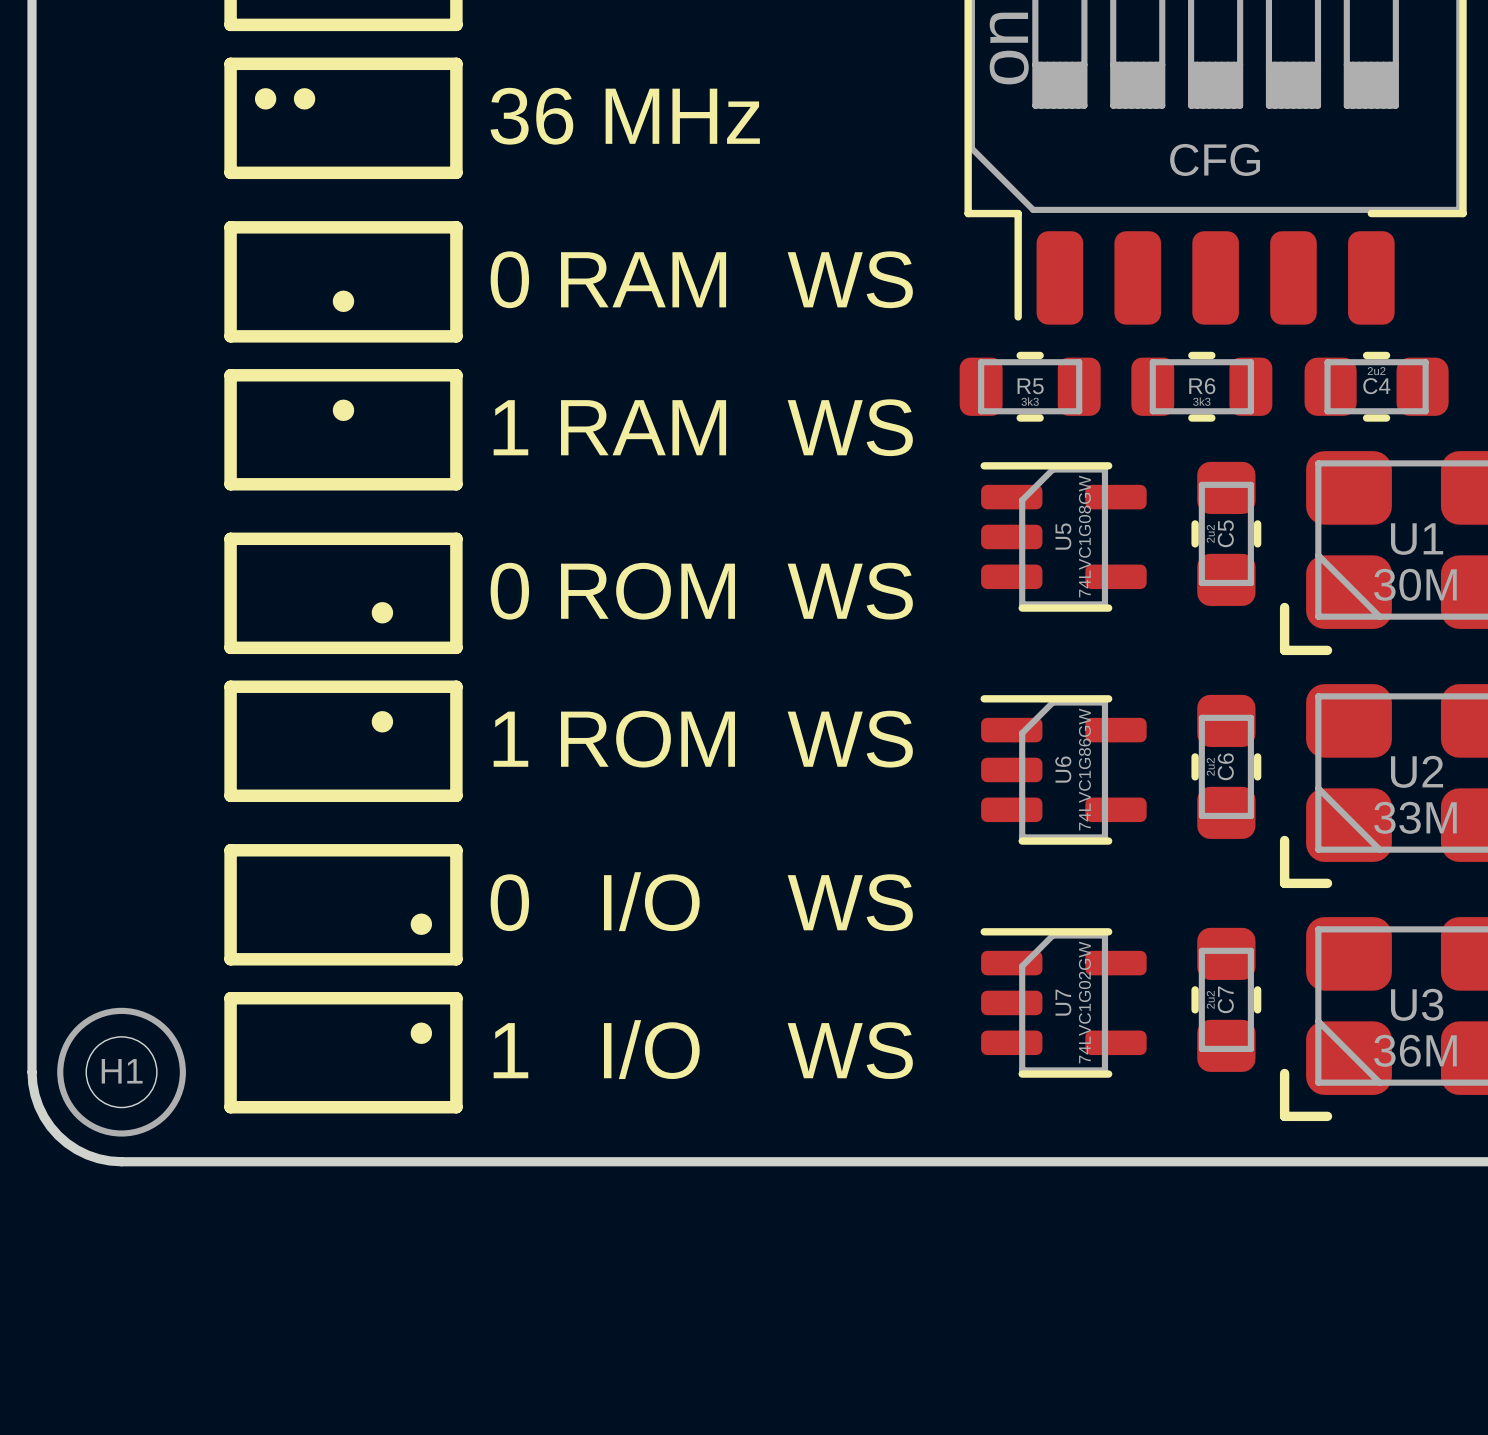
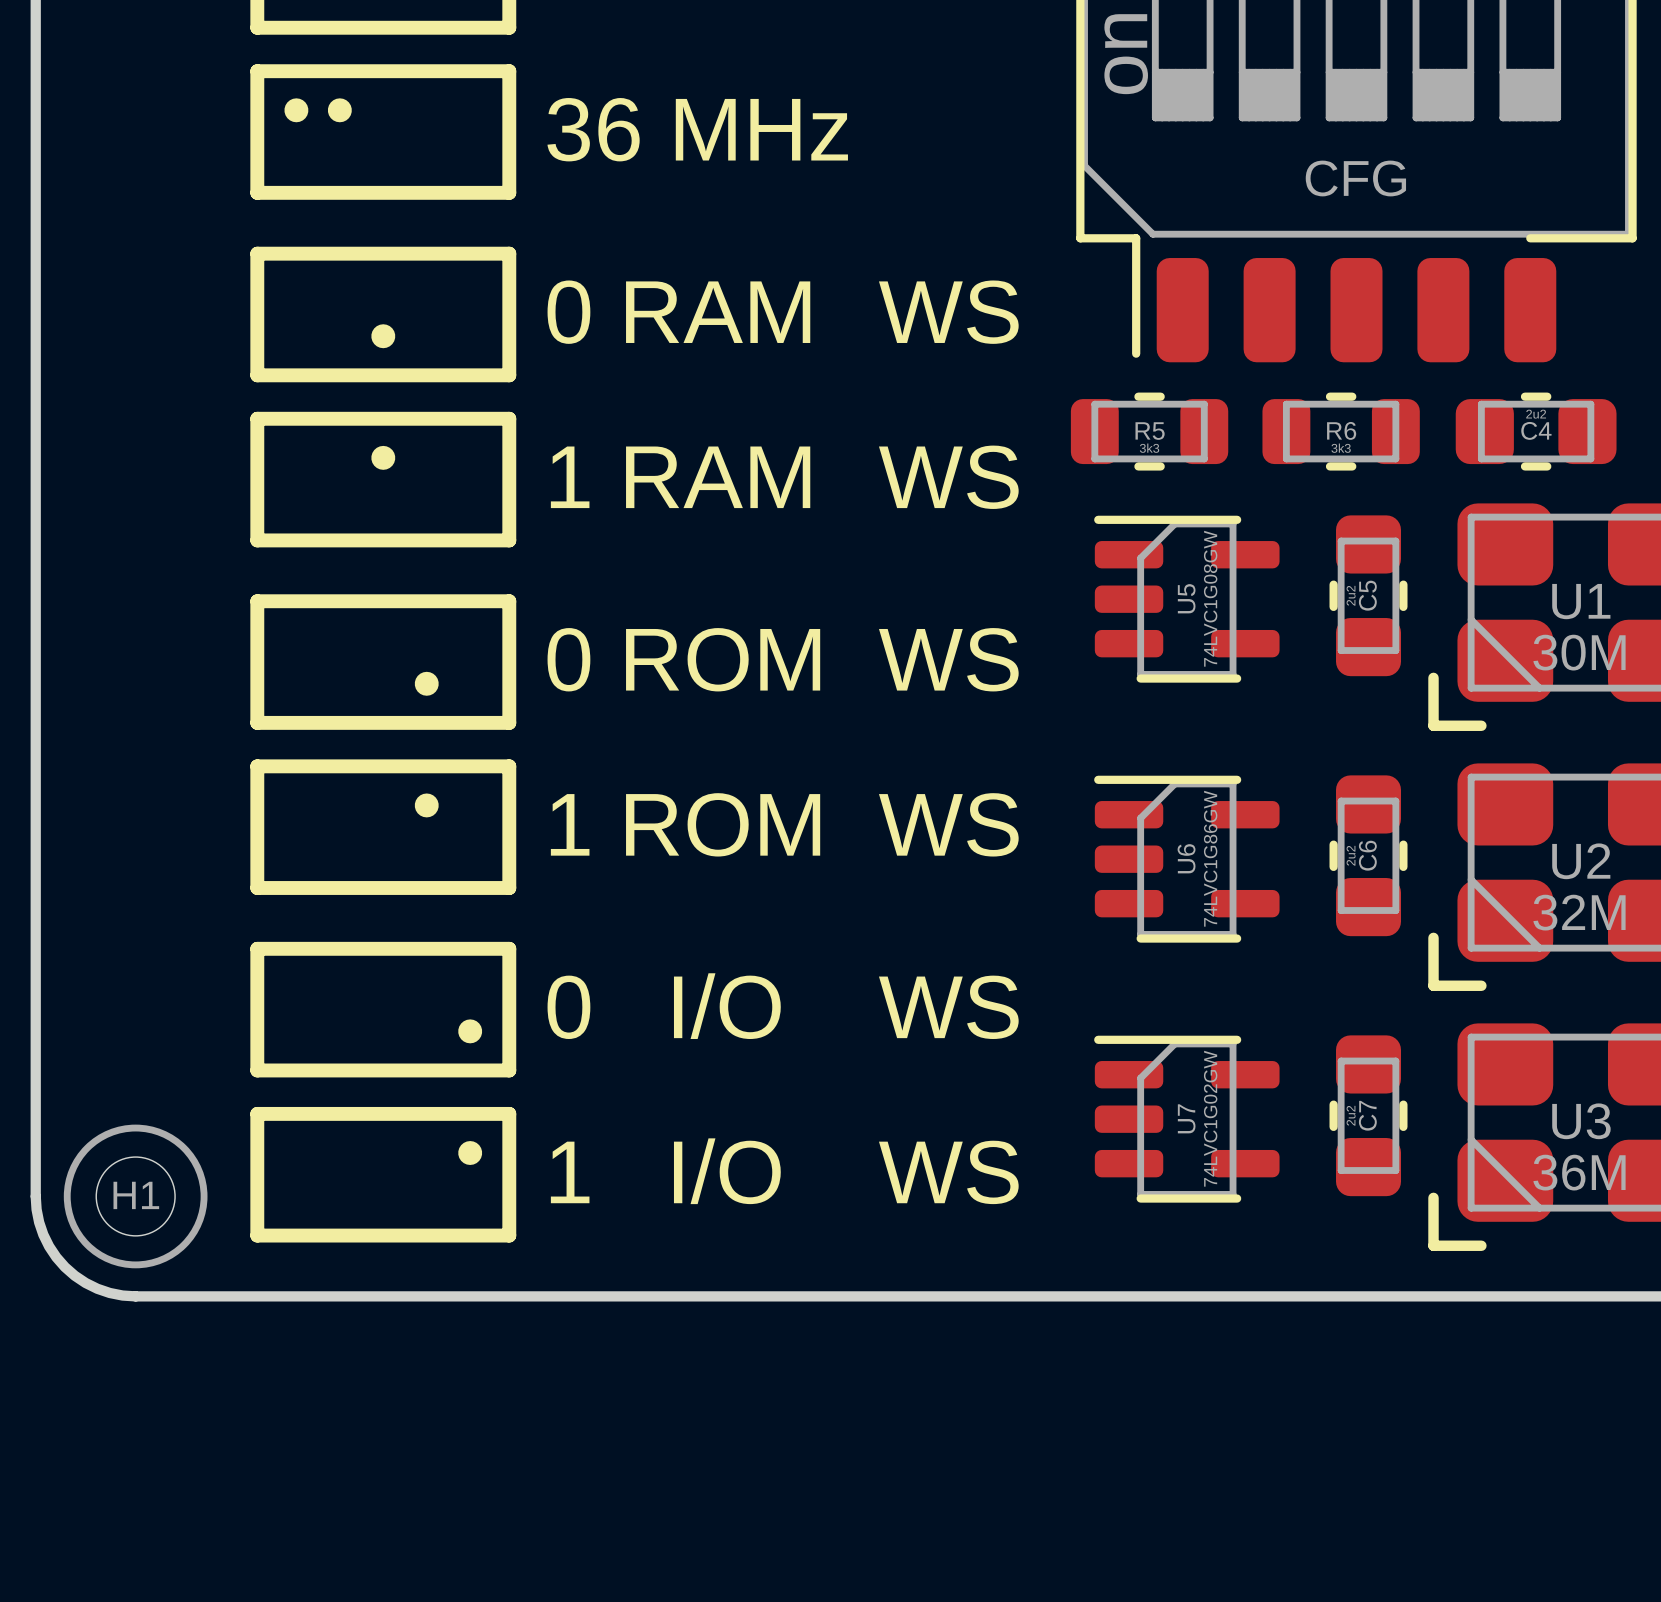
U2 value: 33M (1415, 817) -> 32M (1579, 912)

